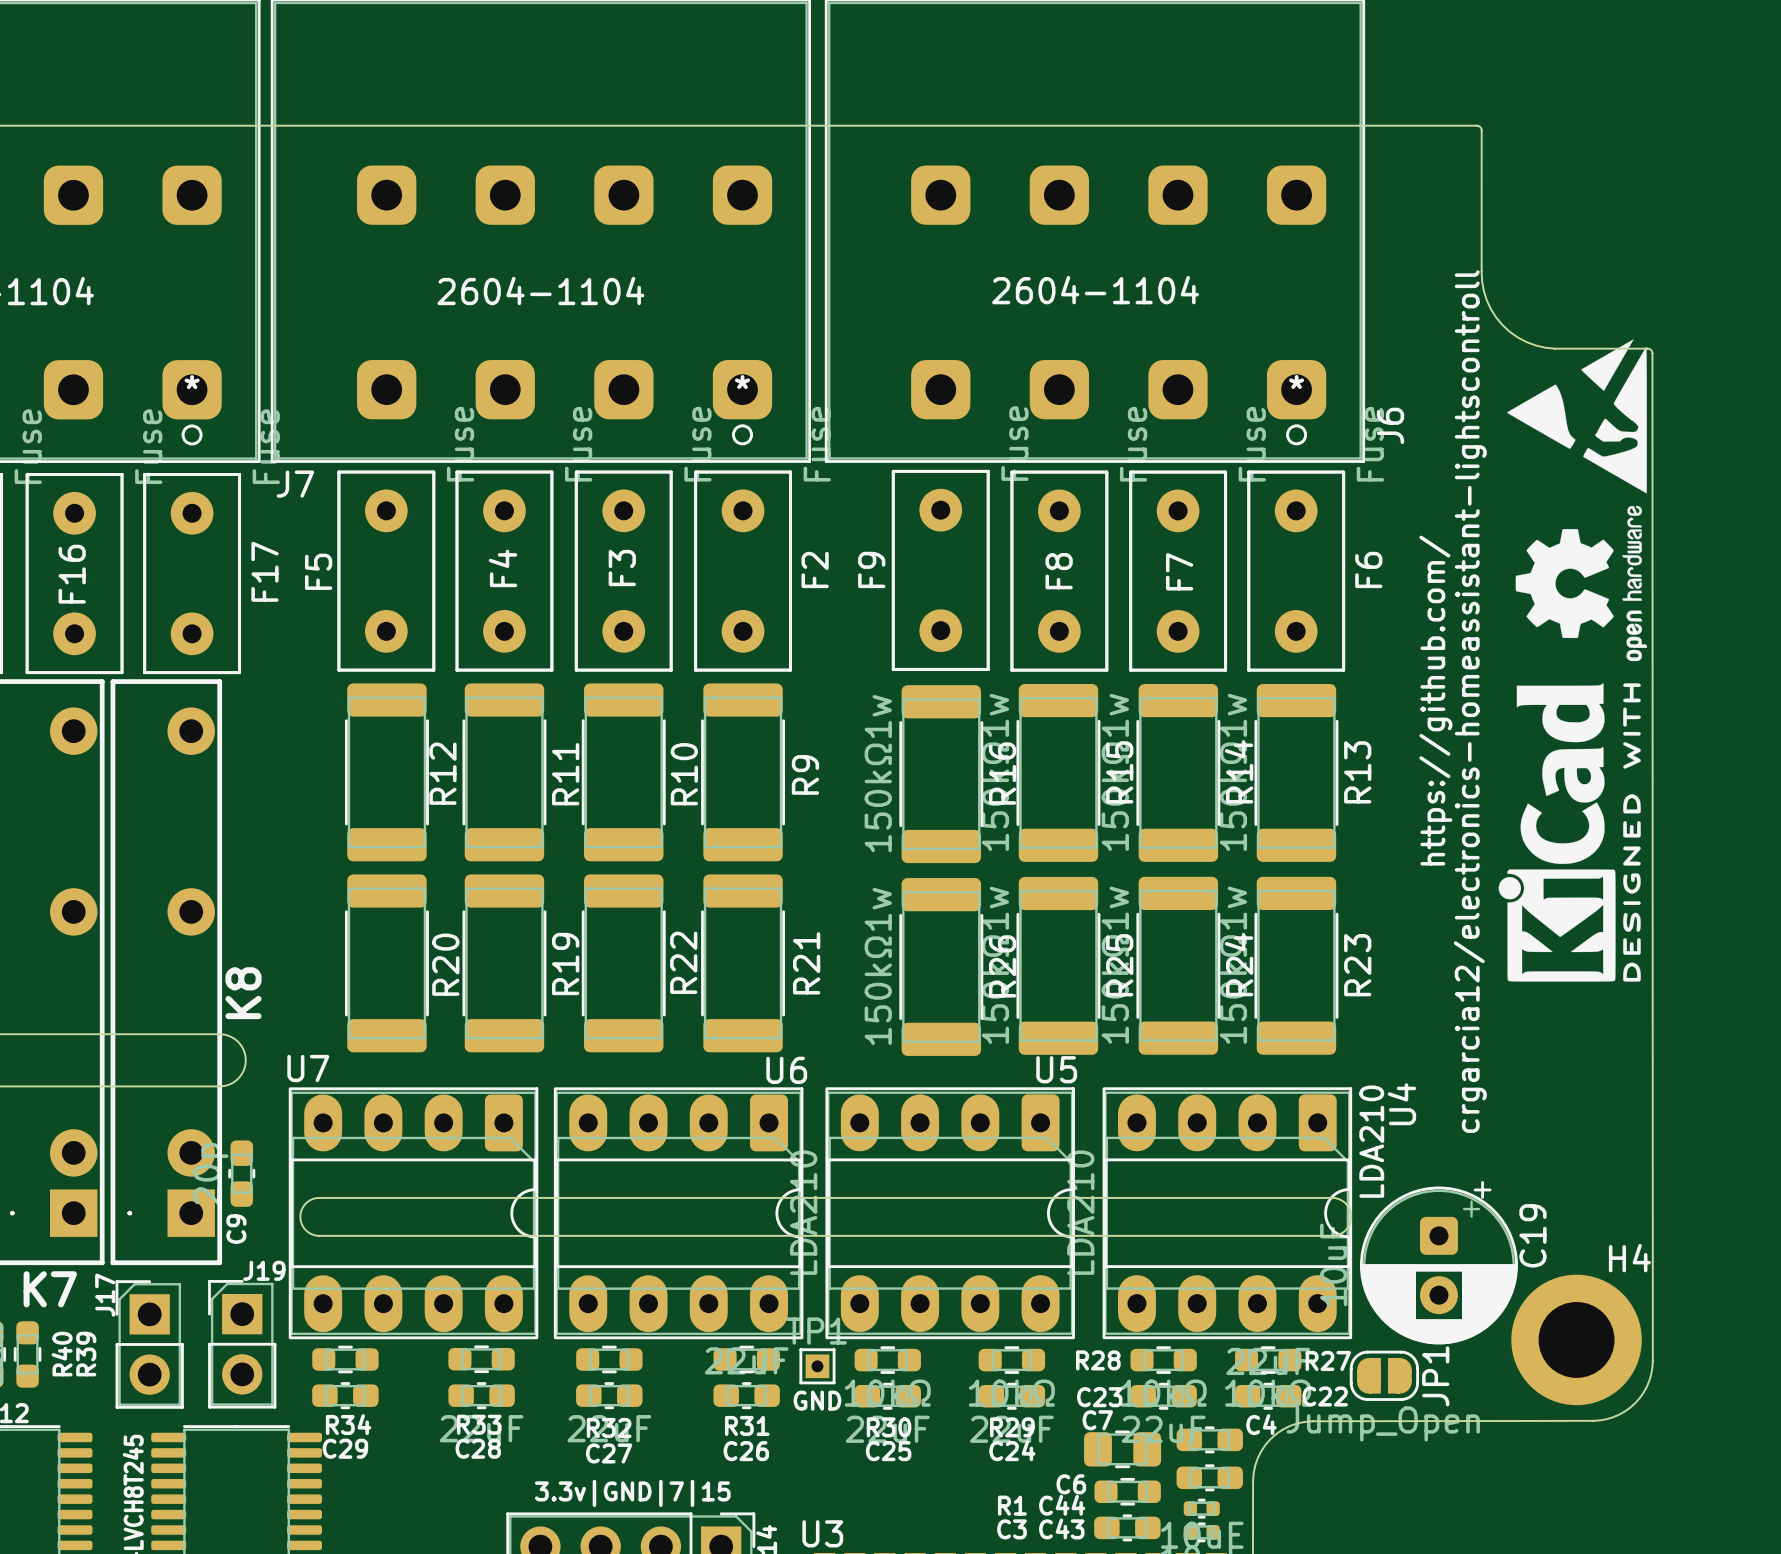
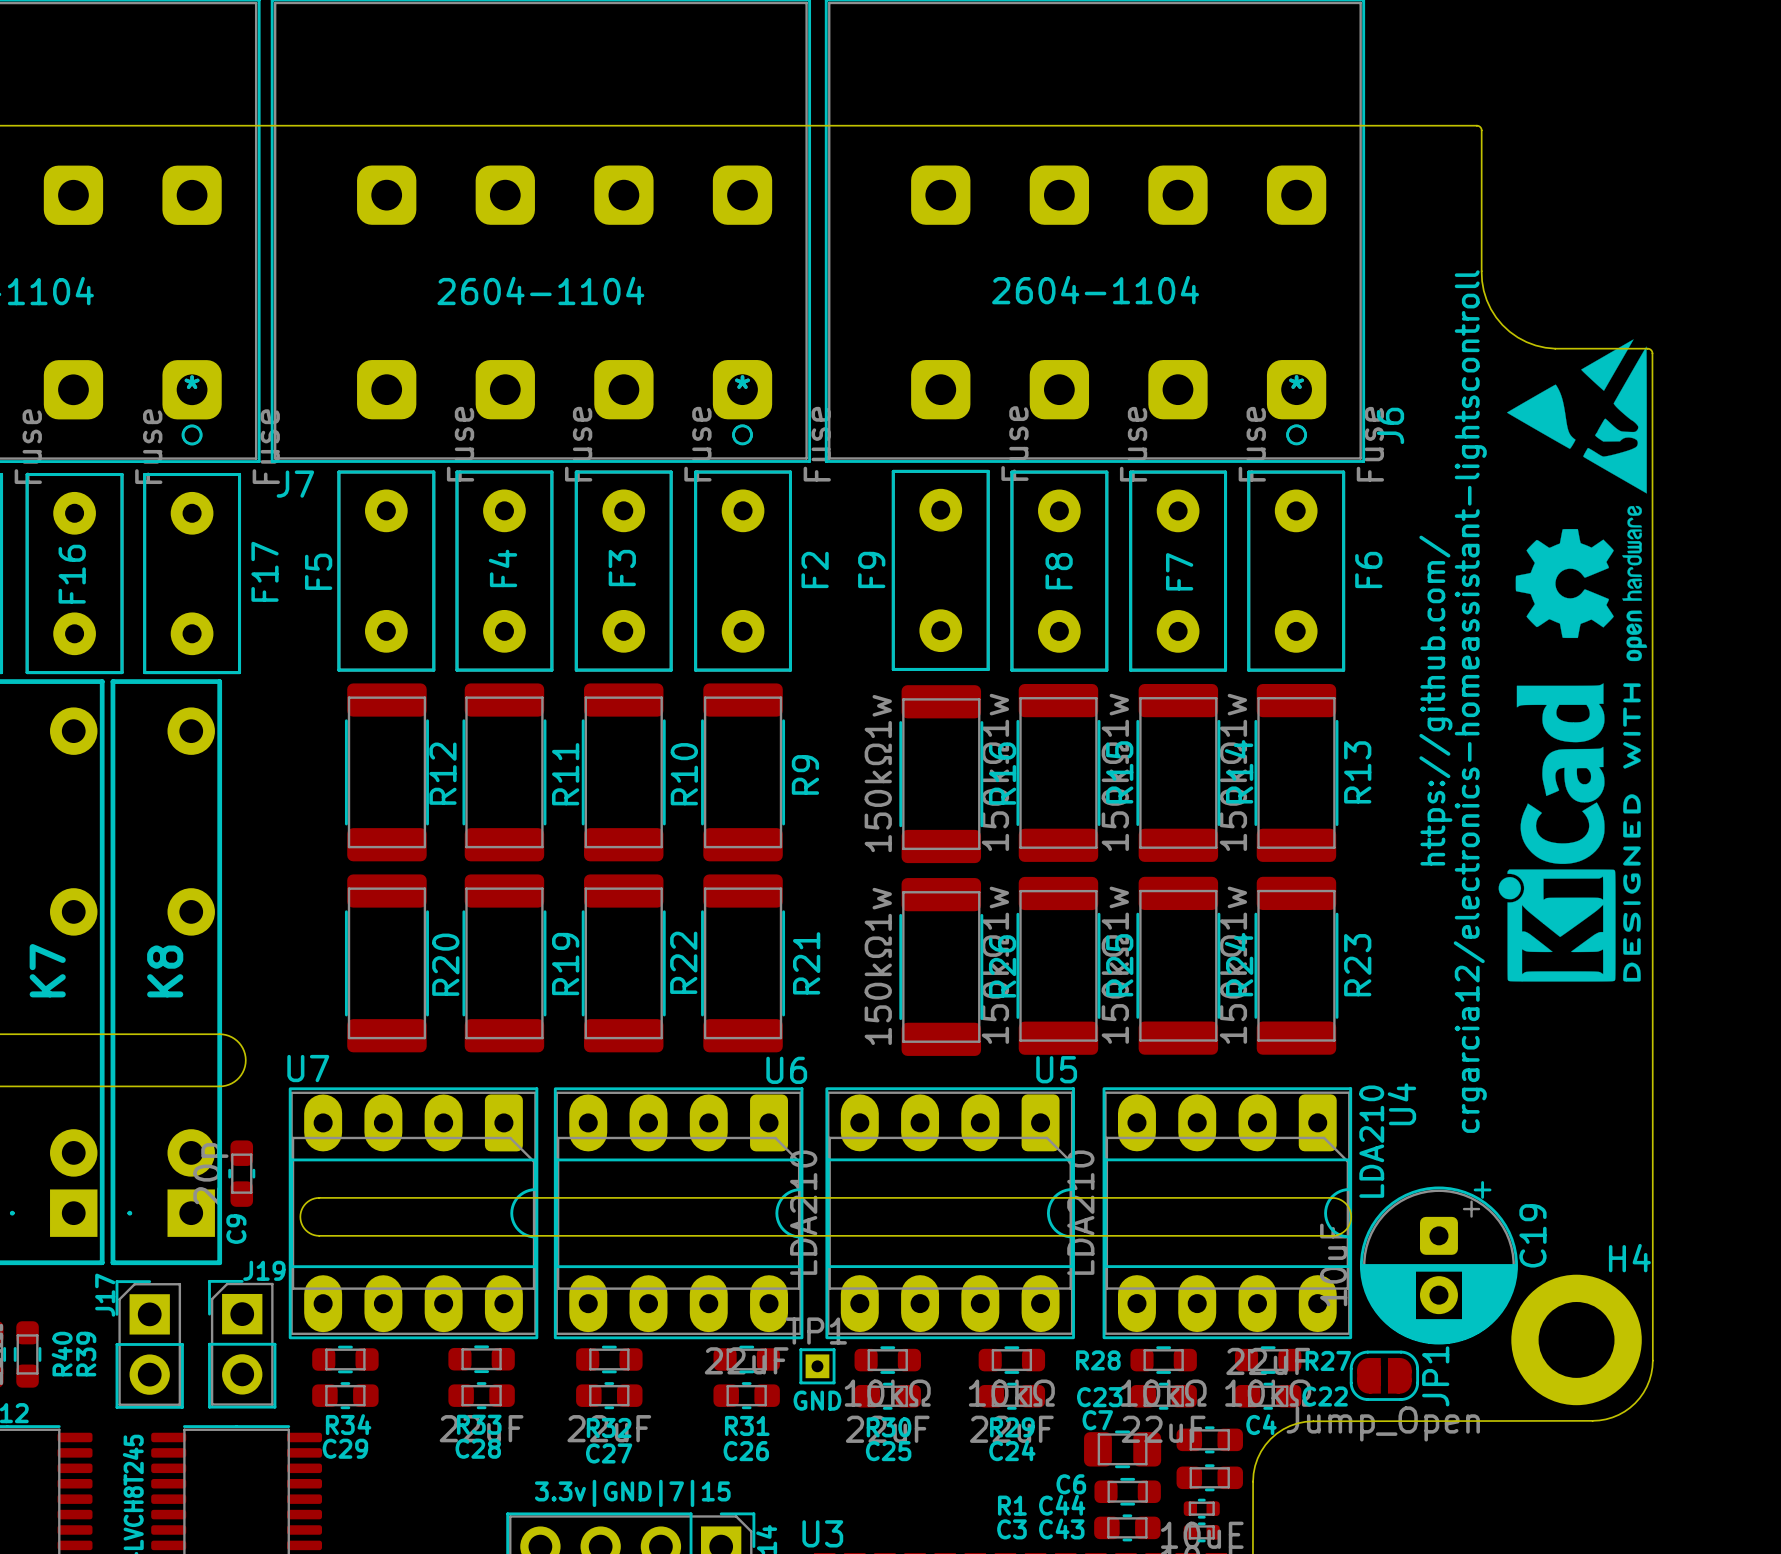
K8 name position: K8 (243, 993) -> K8 (165, 971)
K7 name rotation: 0° (50, 1289) -> 90° counterclockwise (47, 970)
K7 name position: K7 (50, 1289) -> K7 (47, 970)

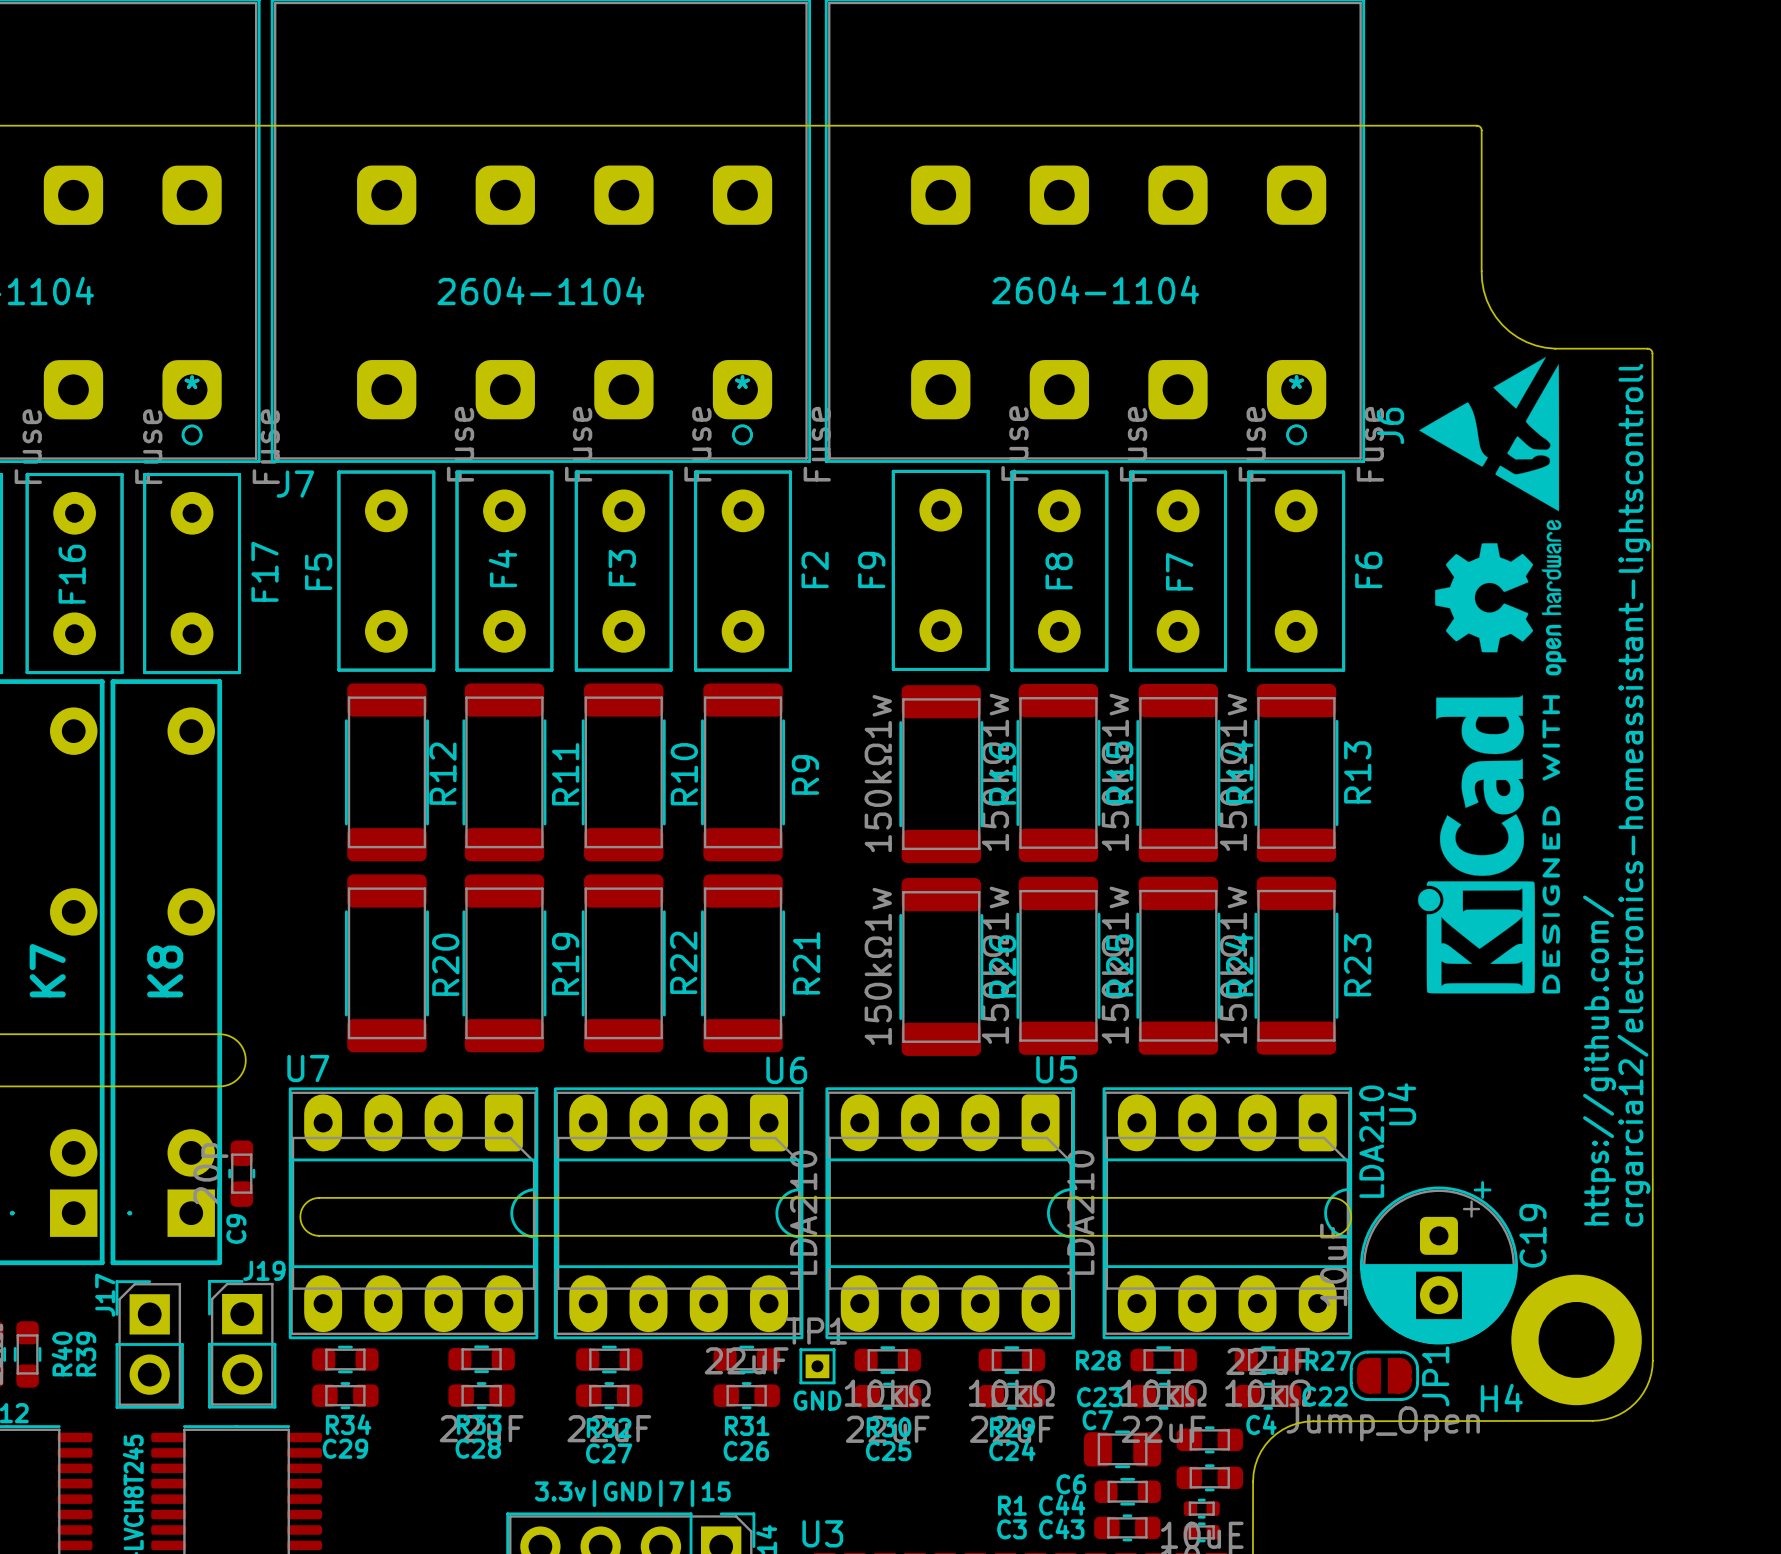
drawing position: (1576, 416) -> (1489, 434)
drawing position: (1581, 583) -> (1500, 597)
text position: https://github.com/ (1435, 700) -> https://github.com/ (1599, 1060)
text position: crgarcia12/electronics-homeassistant-lightscontroll (1470, 701) -> crgarcia12/electronics-homeassistant-lightscontroll (1633, 795)
drawing position: (1569, 832) -> (1489, 844)
H4 name position: H4 (1629, 1258) -> H4 (1501, 1398)

